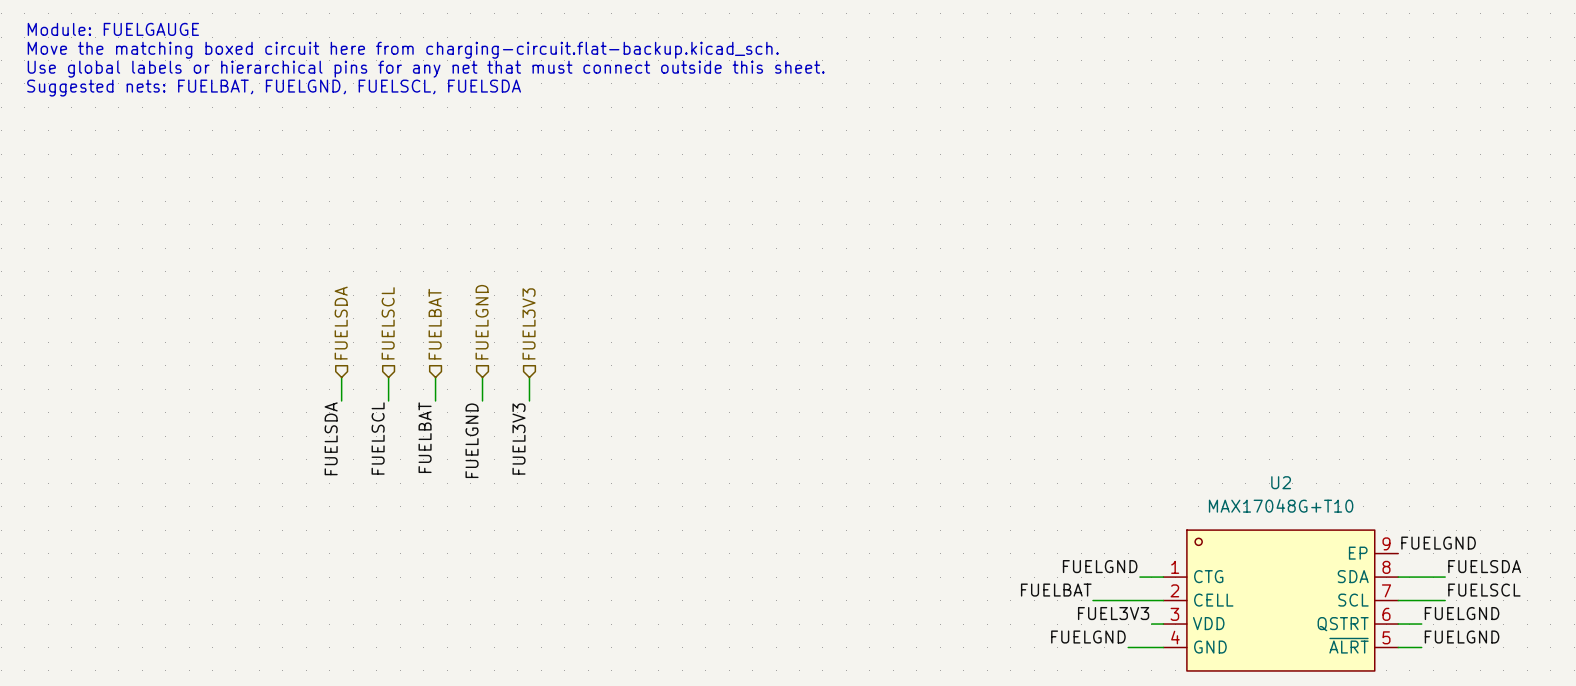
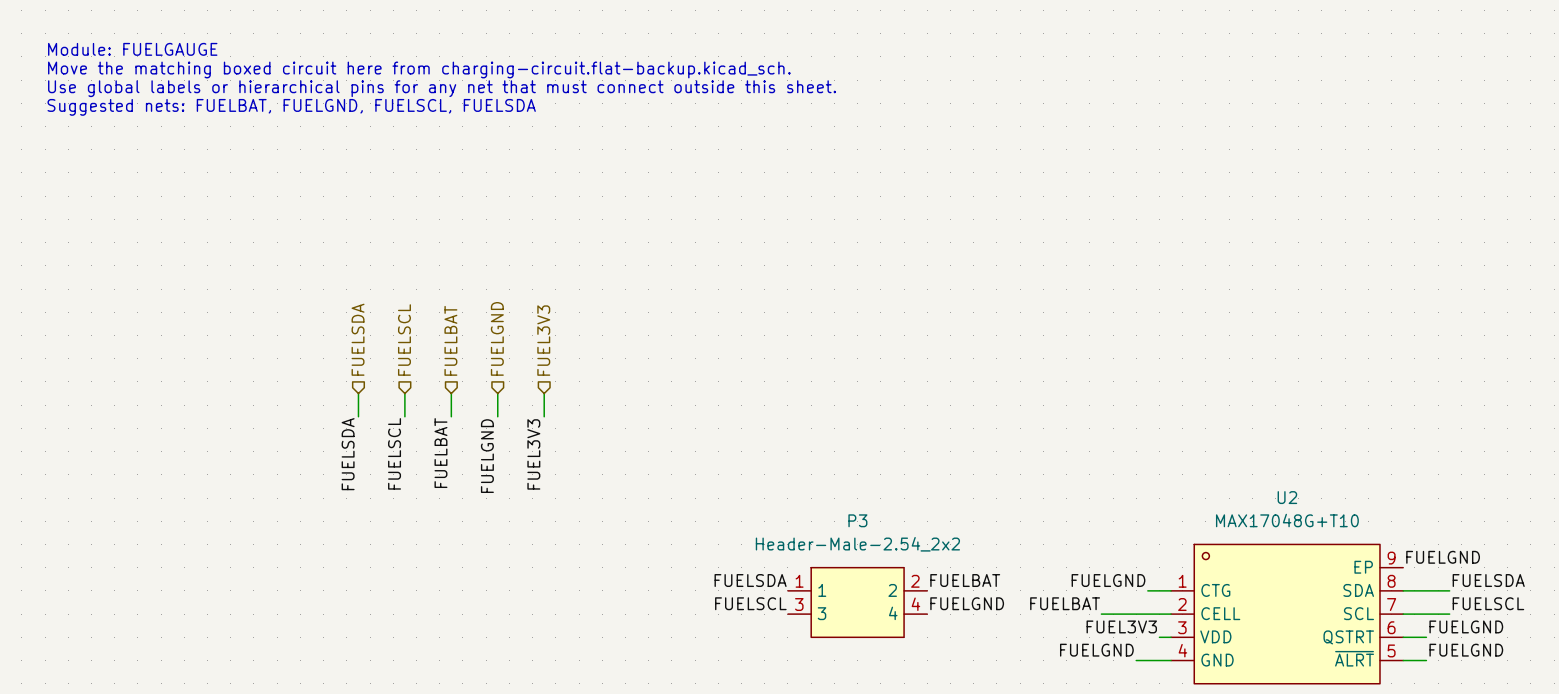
label: none -> FUELSDA (750, 580)
label: none -> FUELBAT (965, 580)
P3: none -> Header-Male-2.54_2x2 (857, 602)
label: none -> FUELSCL (750, 603)
label: none -> FUELGND (967, 603)

